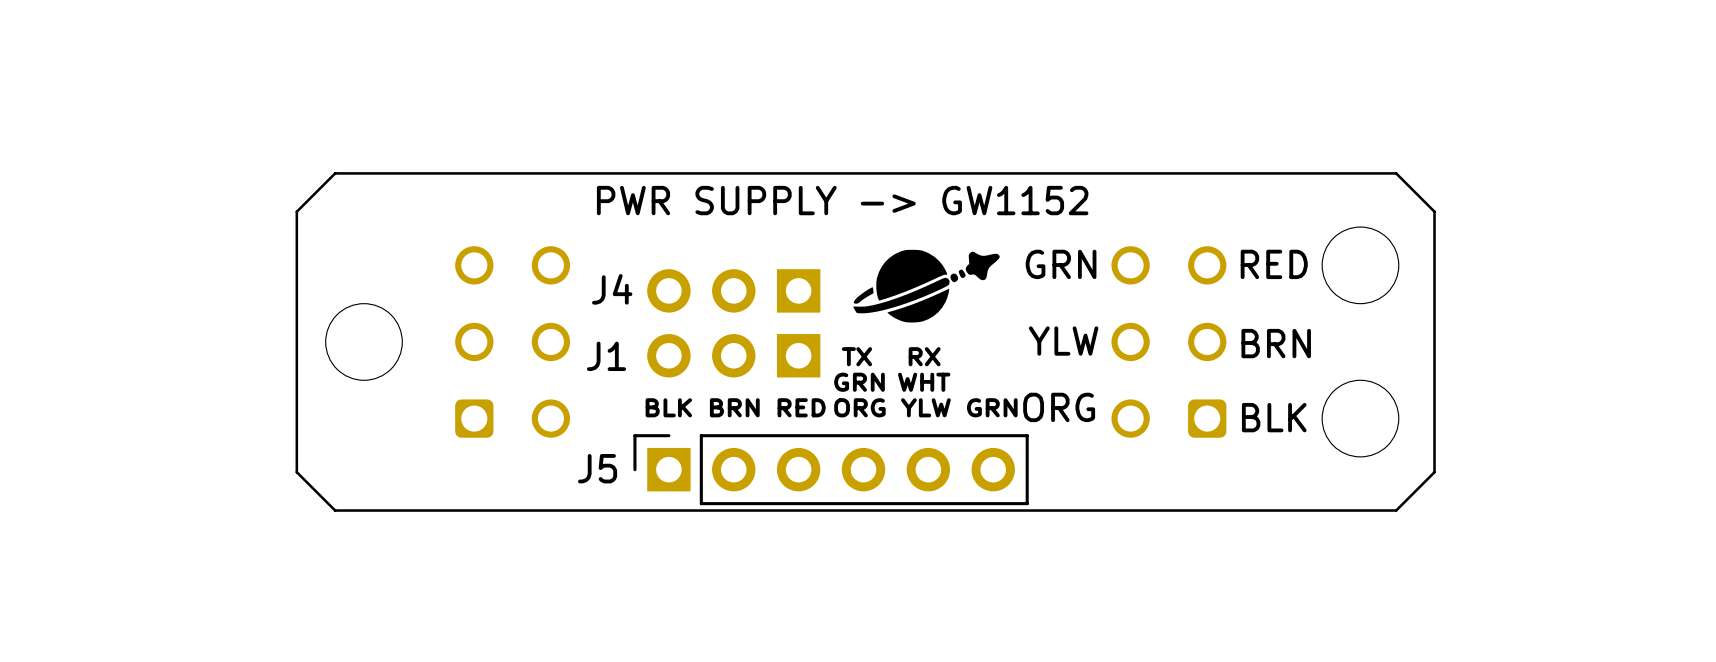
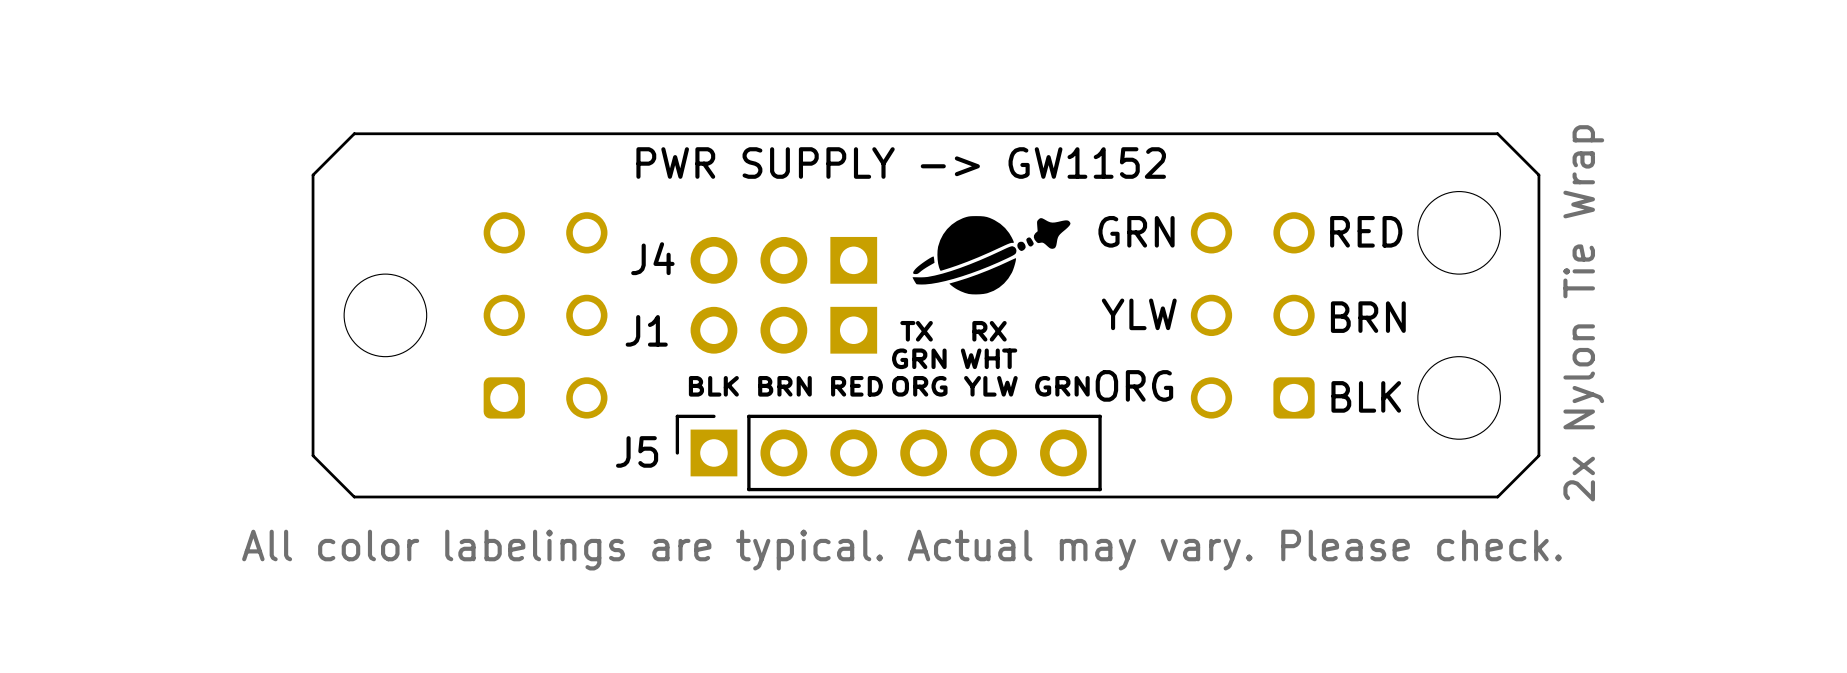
text: none -> 2x Nylon Tie Wrap (1583, 313)
text: none -> All color labelings are typical. Actual may vary. Please check. (901, 550)

